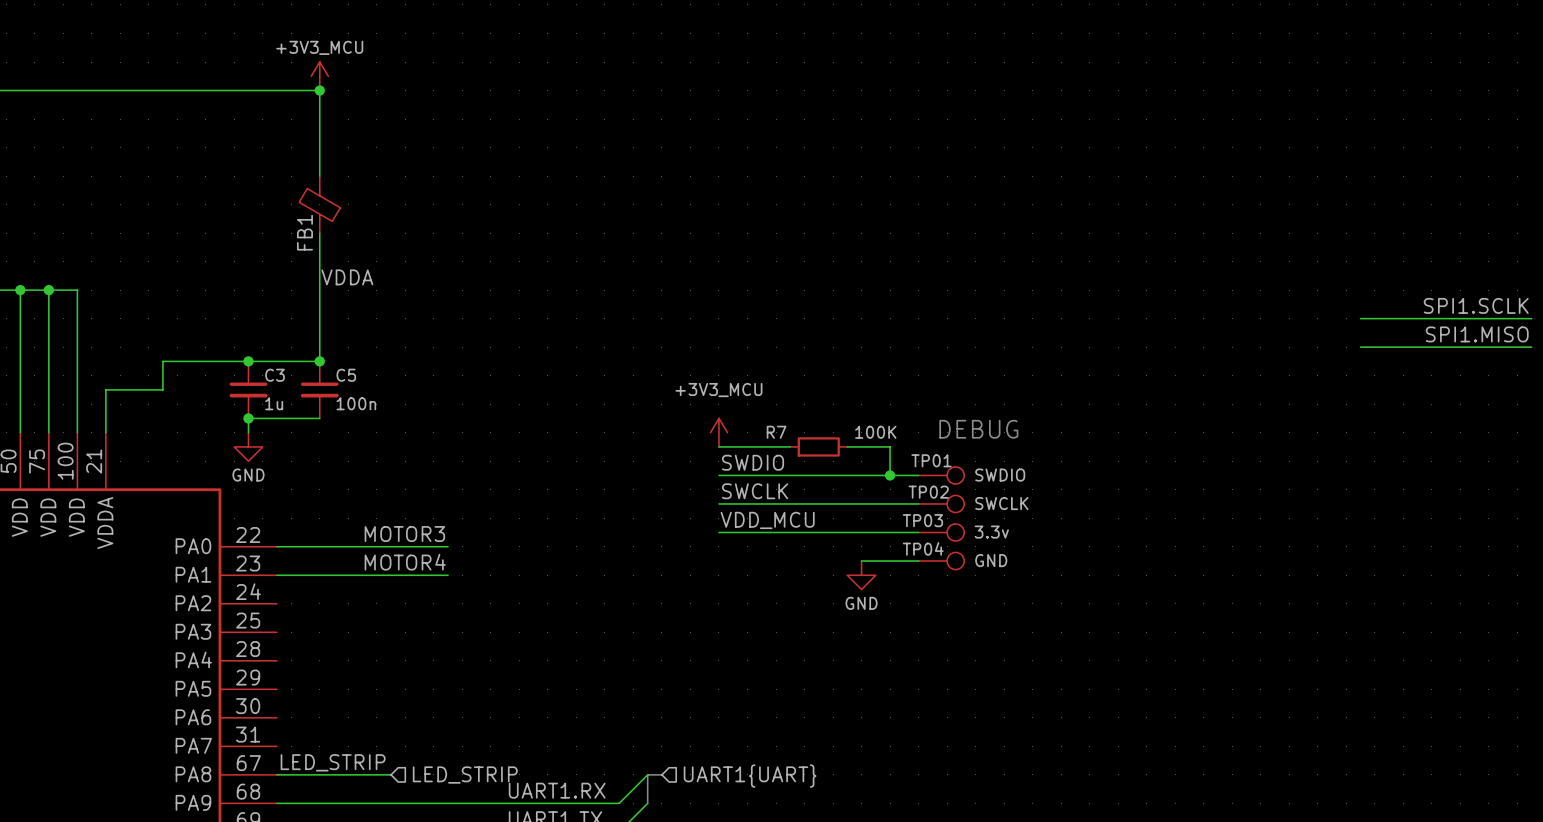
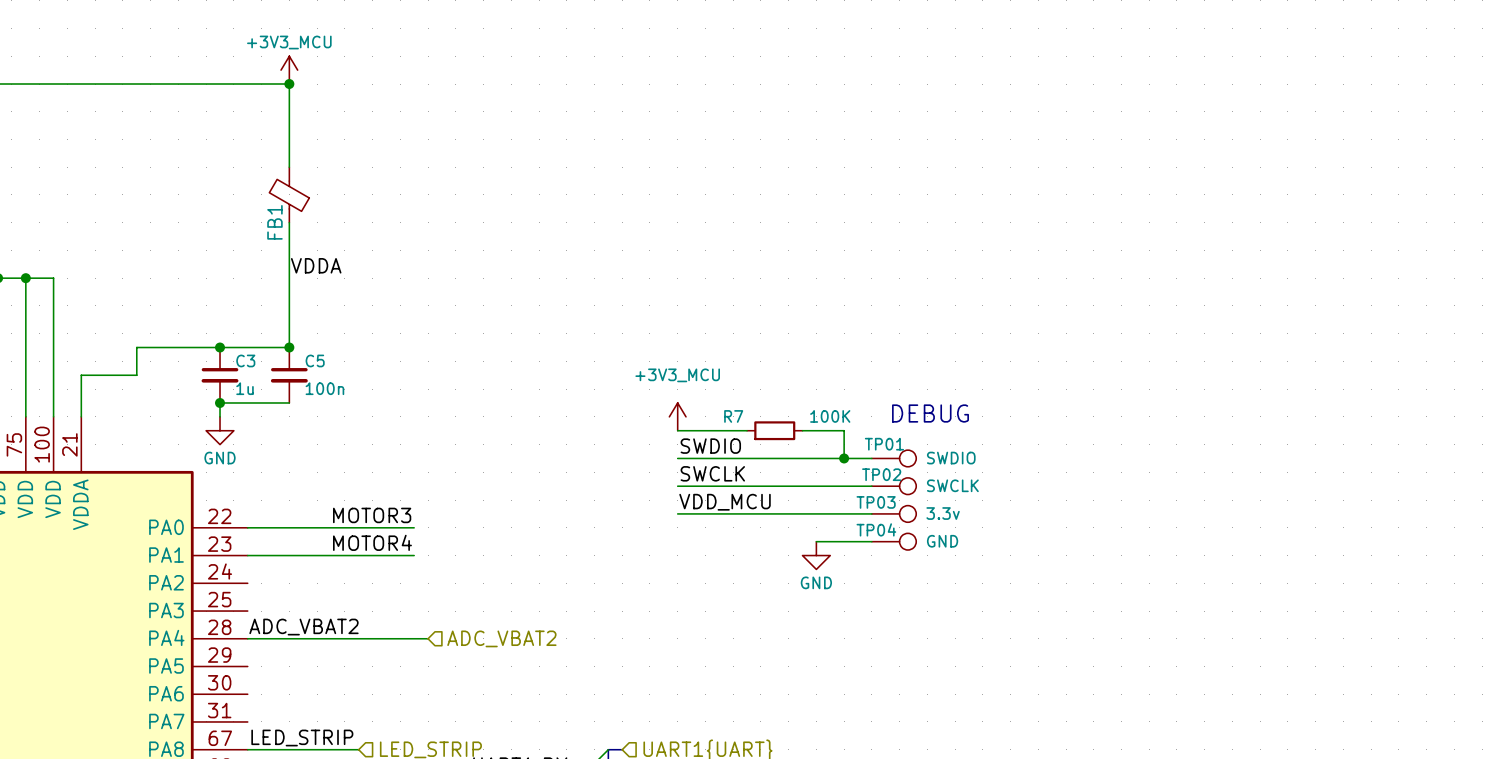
label: SPI1.SCLK (1476, 305) -> none
wire: (1360, 318) (1531, 318) -> none
label: SPI1.MISO (1477, 334) -> none
wire: (1360, 347) (1531, 347) -> none
label: none -> ADC_VBAT2 (303, 627)
wire: none -> (247, 638) (428, 638)
hierarchical label: none -> ADC_VBAT2 (501, 638)

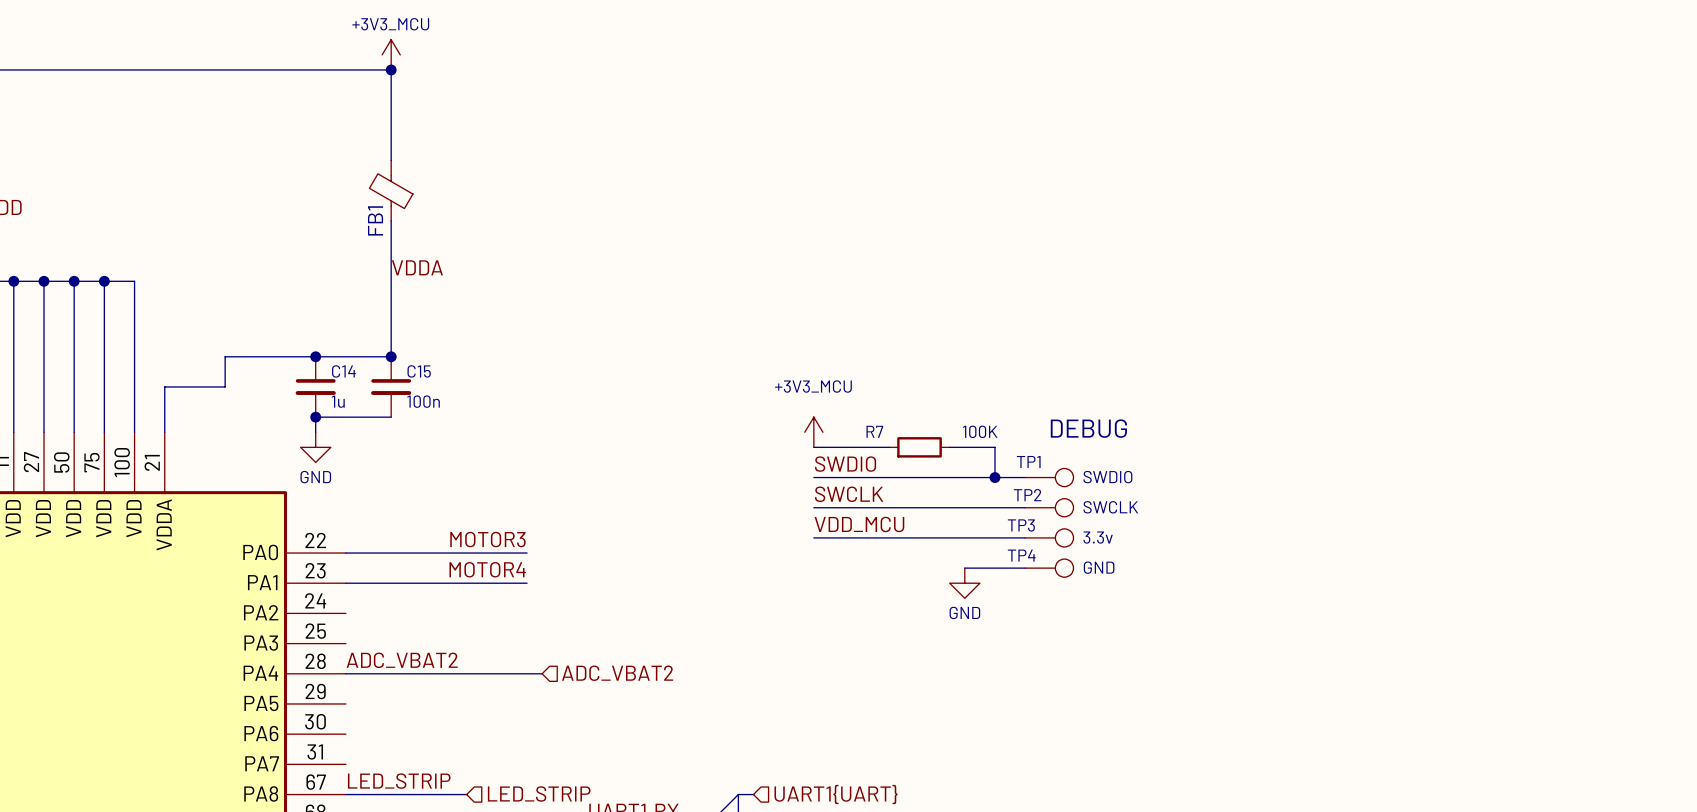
C3 name: C3 (245, 360) -> C14 (343, 371)
C5 name: C5 (315, 360) -> C15 (419, 371)
TP01 name: TP01 (884, 444) -> TP1 (1028, 461)
TP02 name: TP02 (881, 474) -> TP2 (1027, 495)
TP03 name: TP03 (876, 502) -> TP3 (1021, 525)
TP04 name: TP04 (876, 529) -> TP4 (1021, 555)

